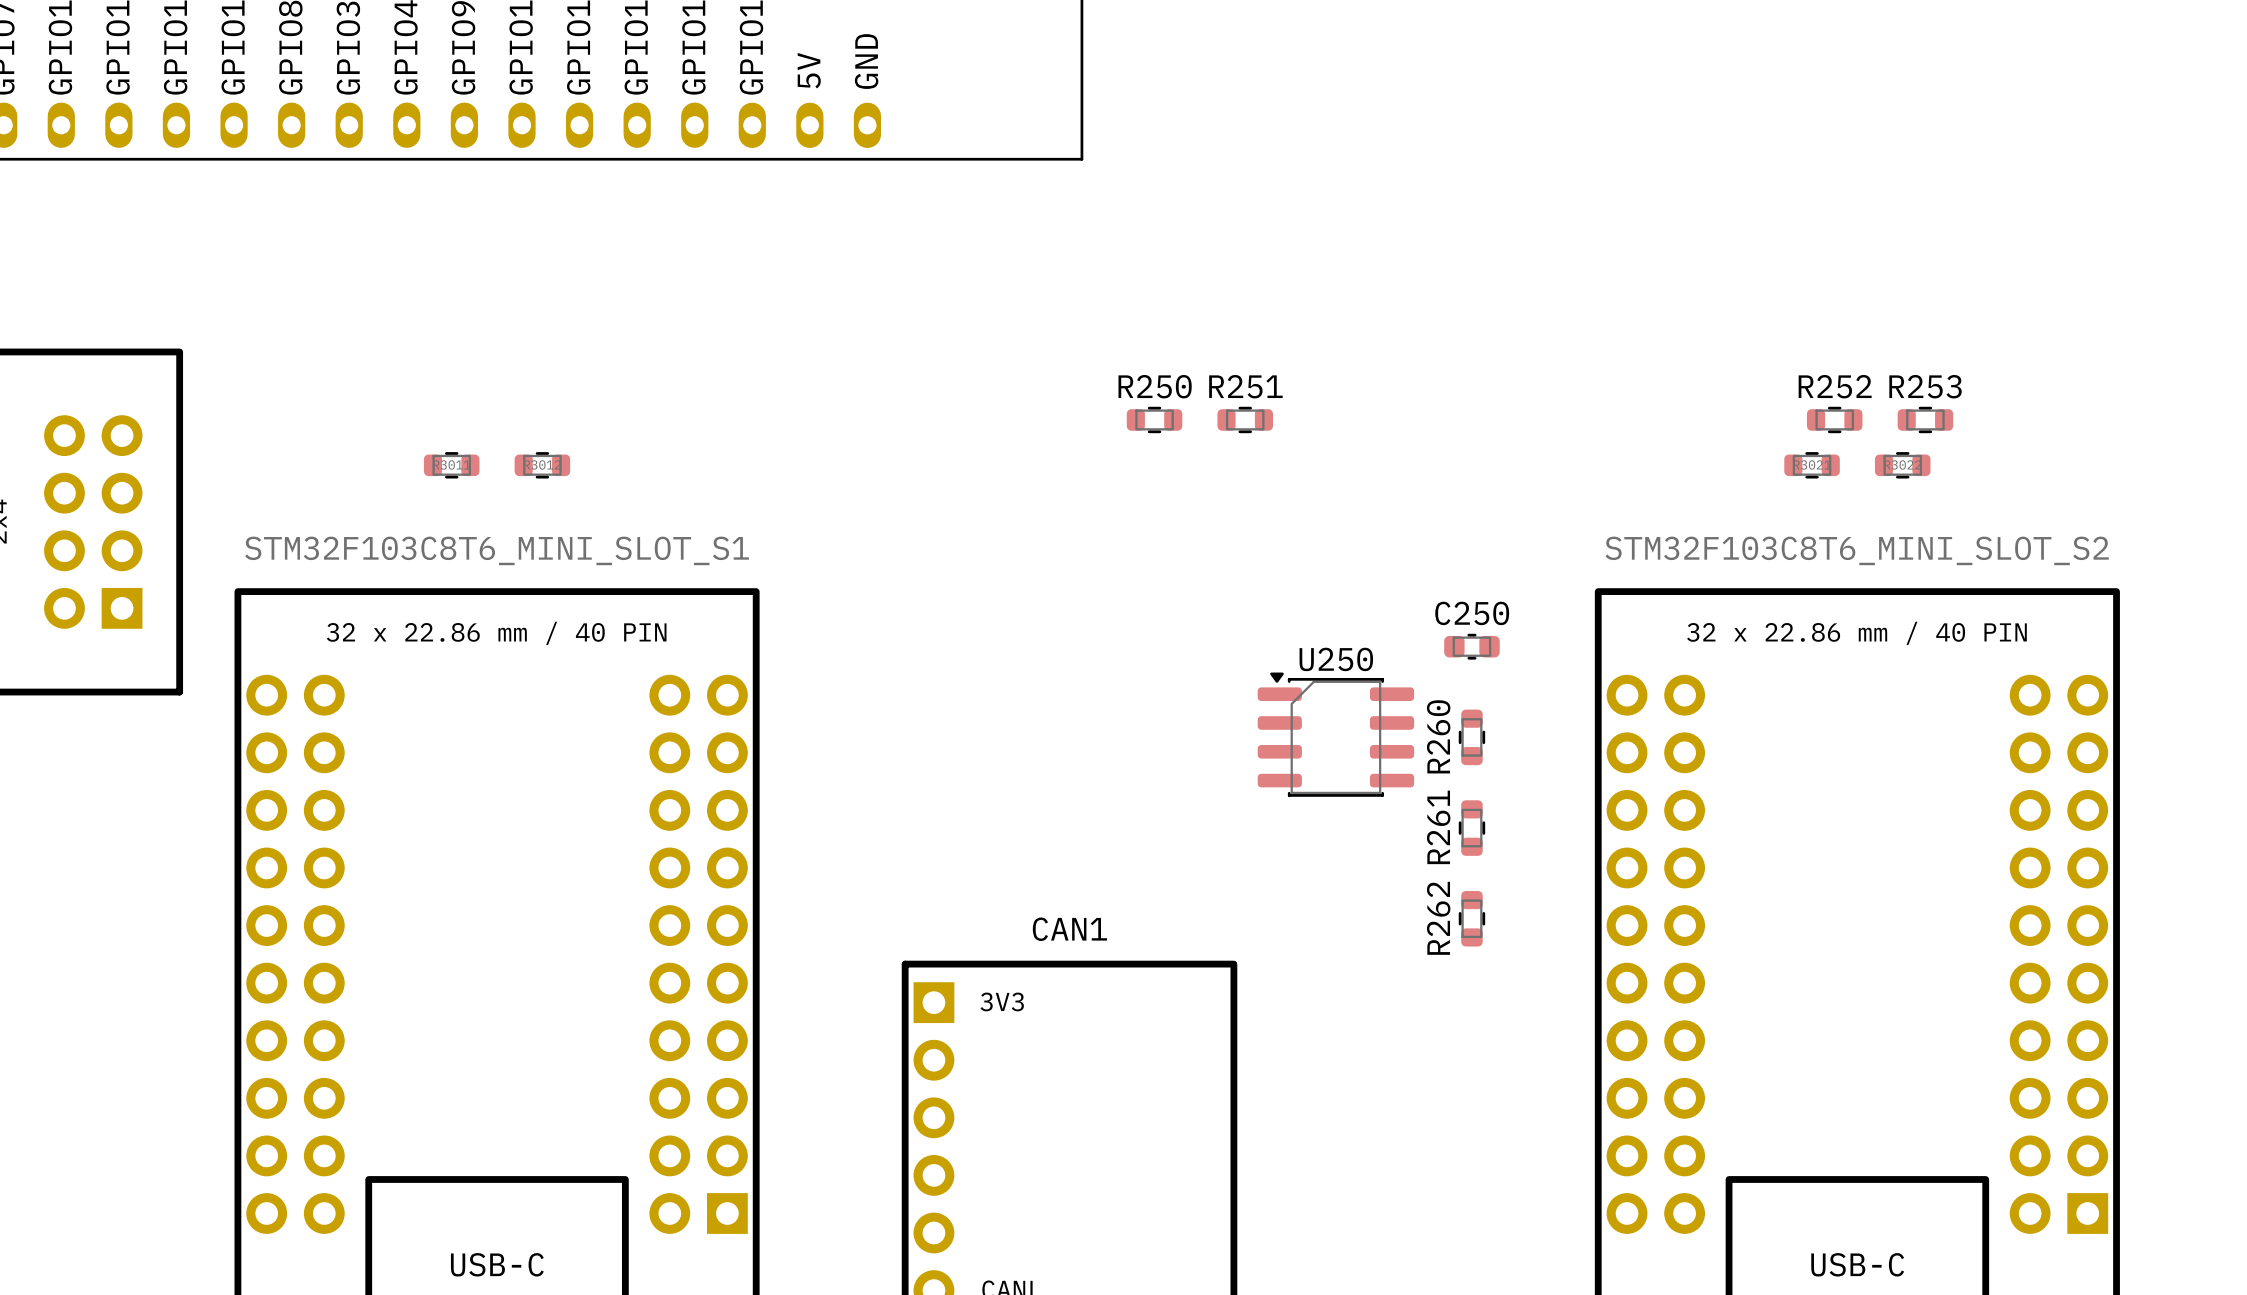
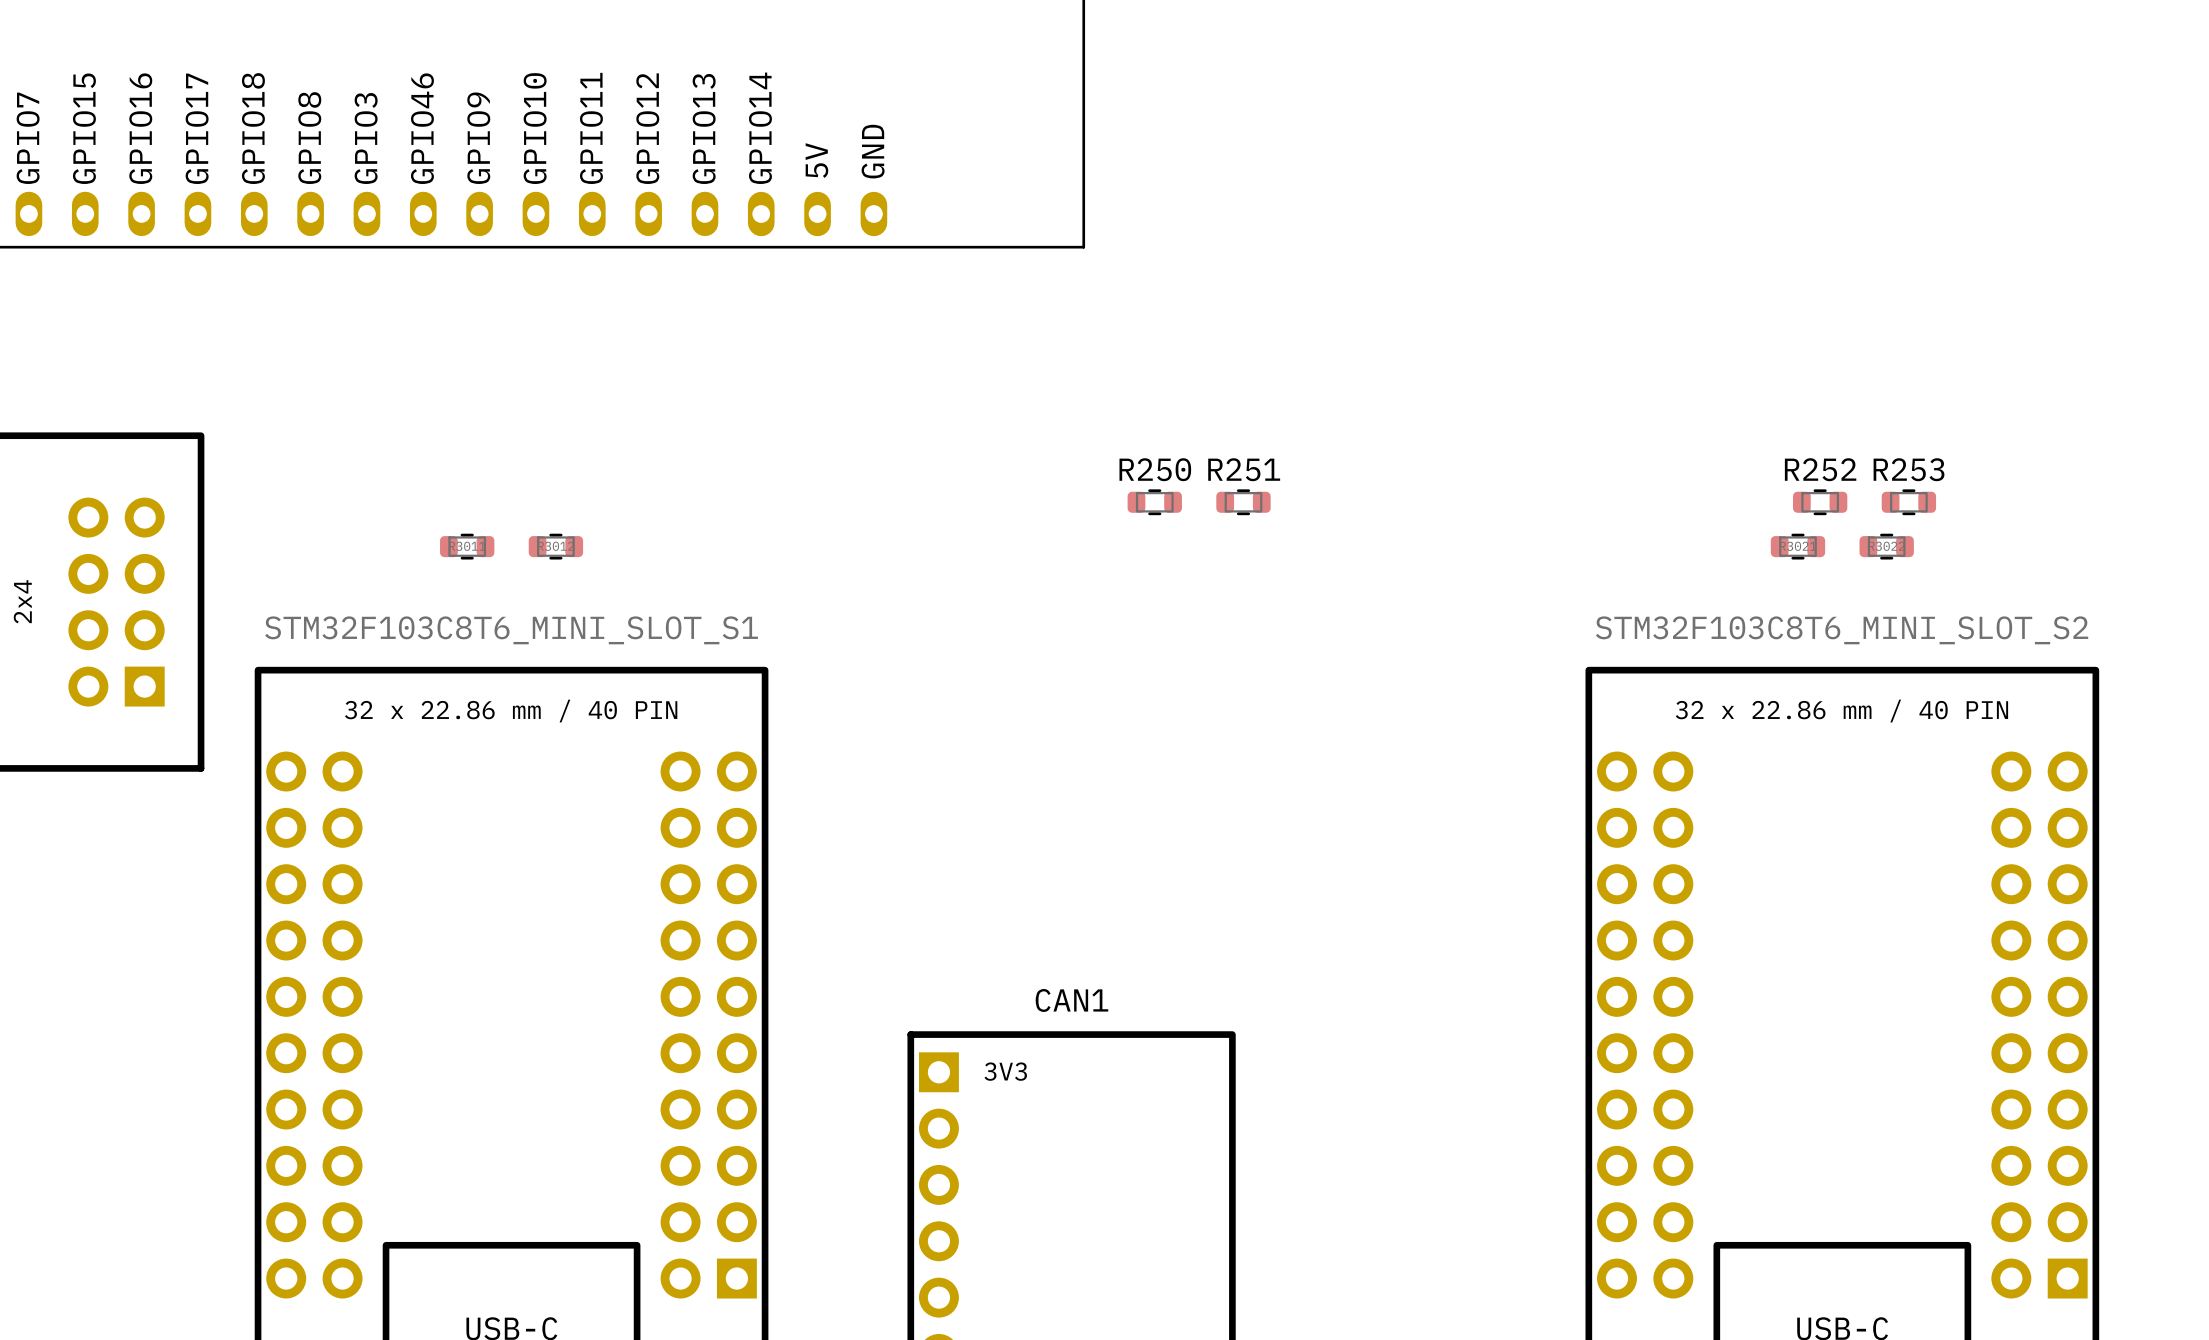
C250: (1471, 646) -> none
U250: (1335, 734) -> none
R260: (1471, 737) -> none
R261: (1471, 828) -> none
R262: (1471, 918) -> none

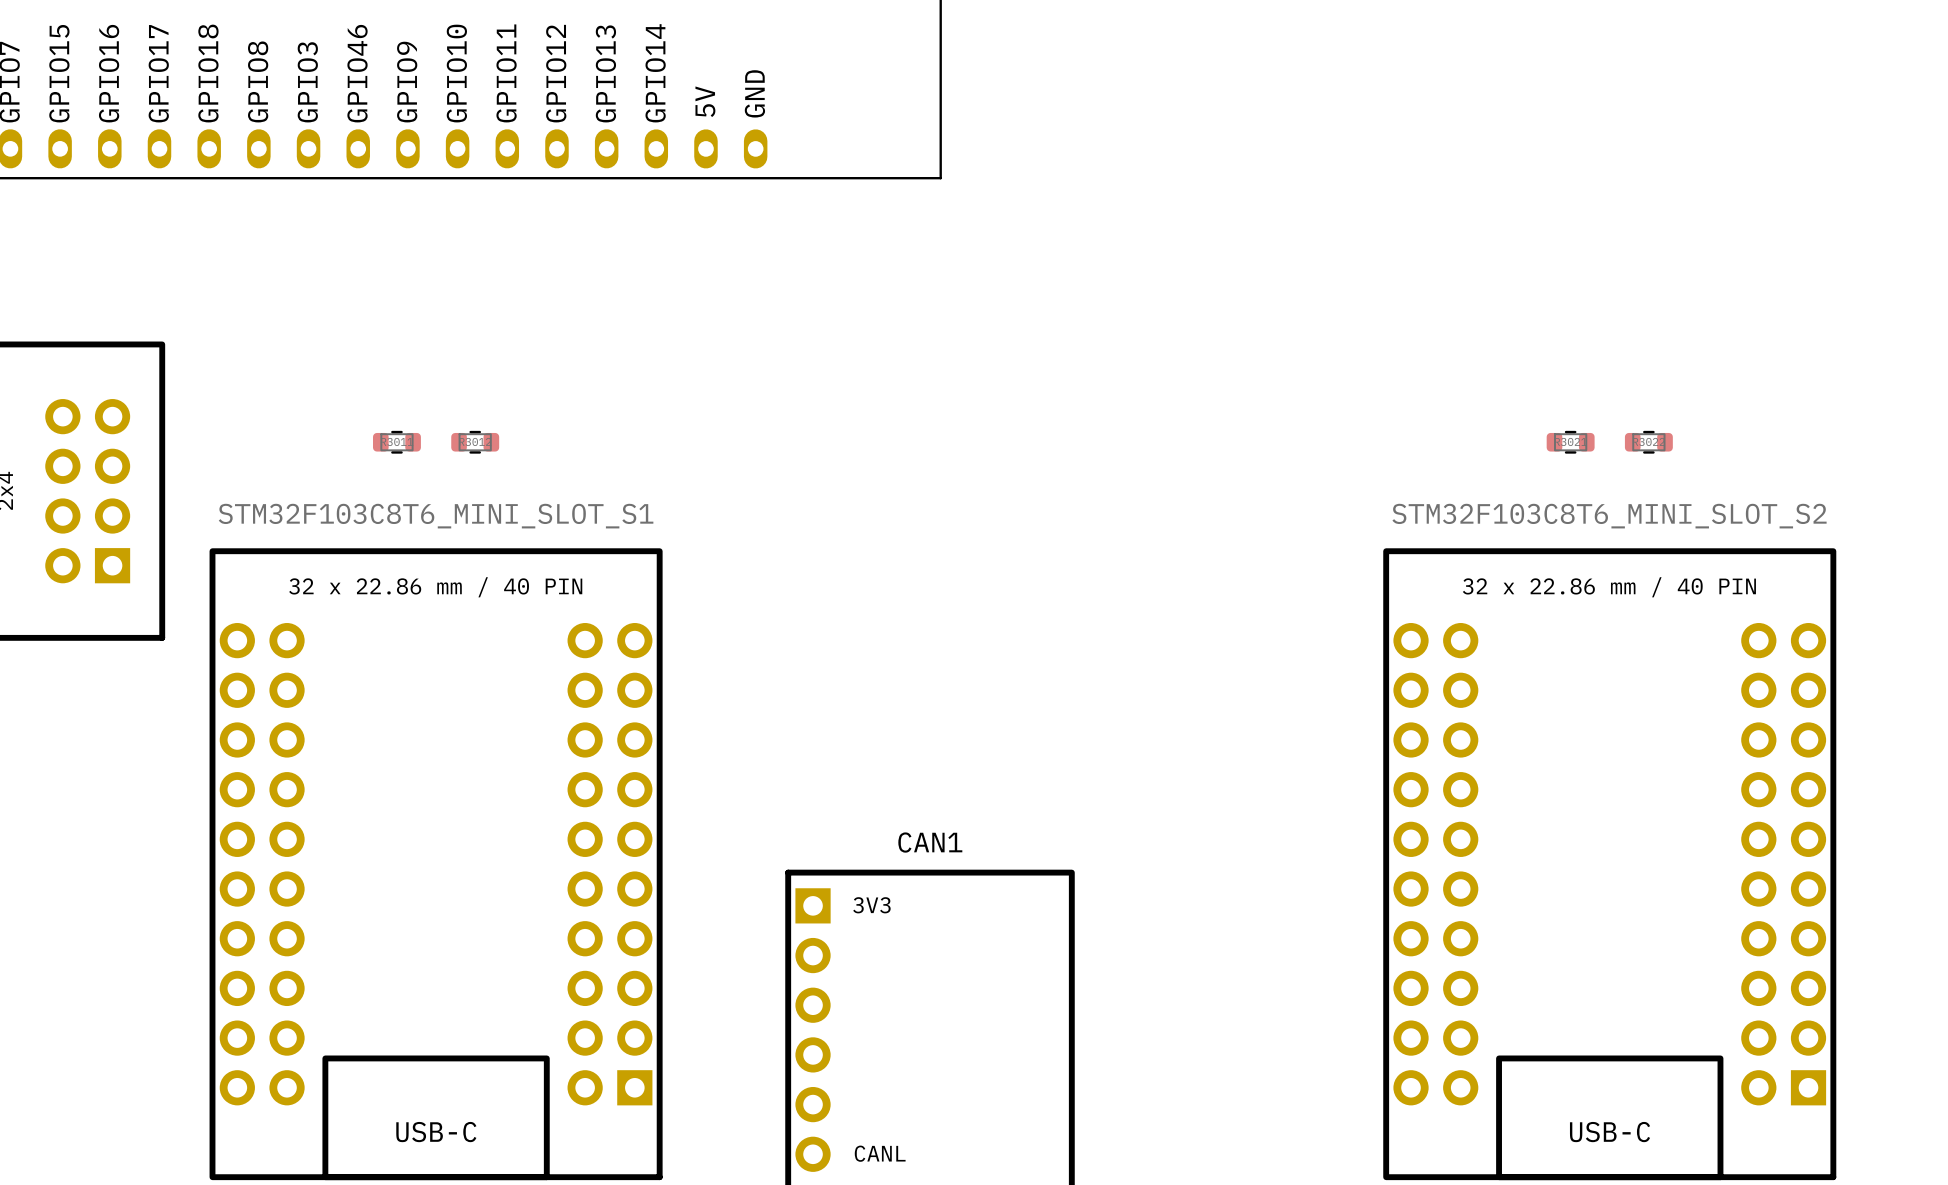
R250: (1154, 502) -> none
R251: (1243, 502) -> none
R252: (1820, 502) -> none
R253: (1908, 502) -> none

